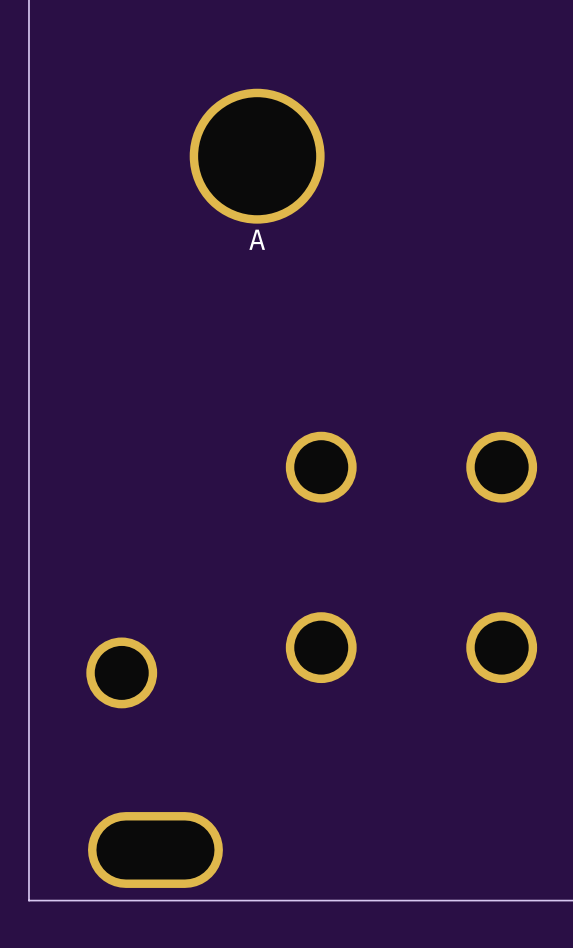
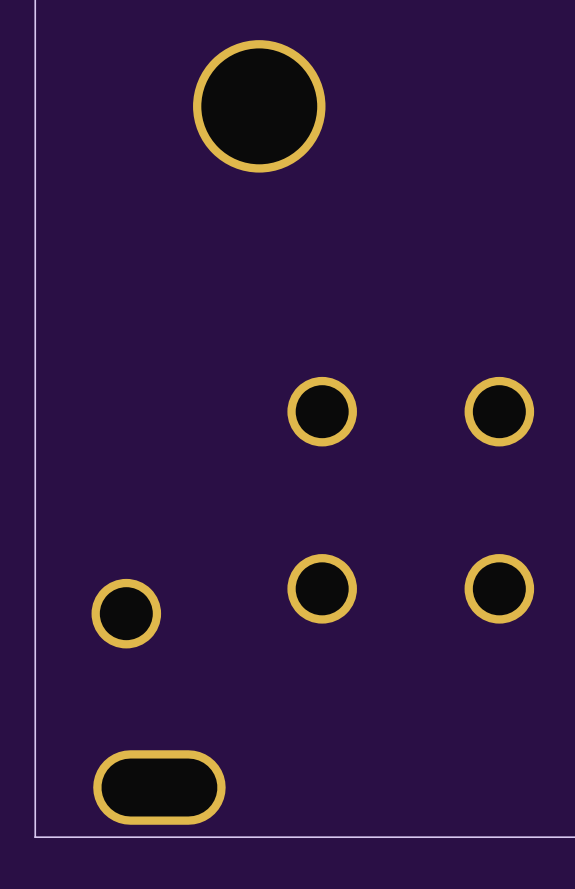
part text: A (257, 239) -> none

